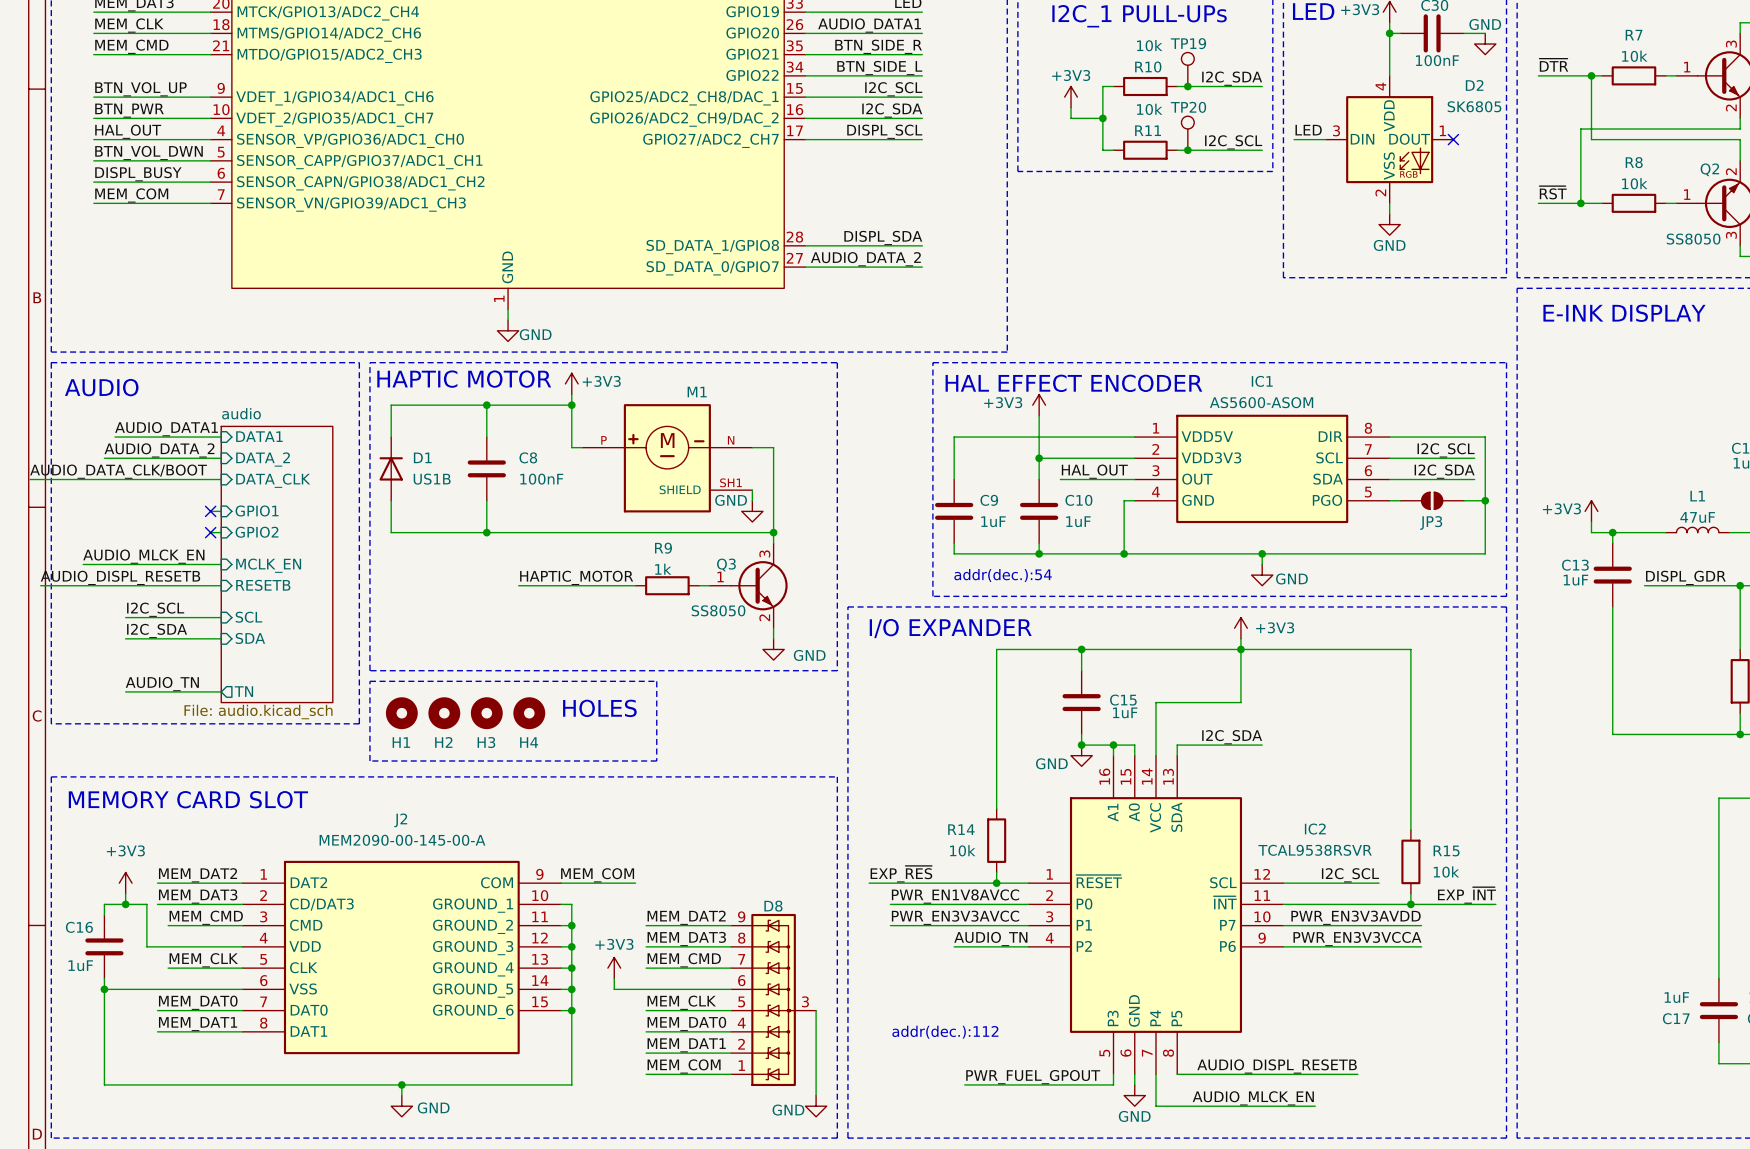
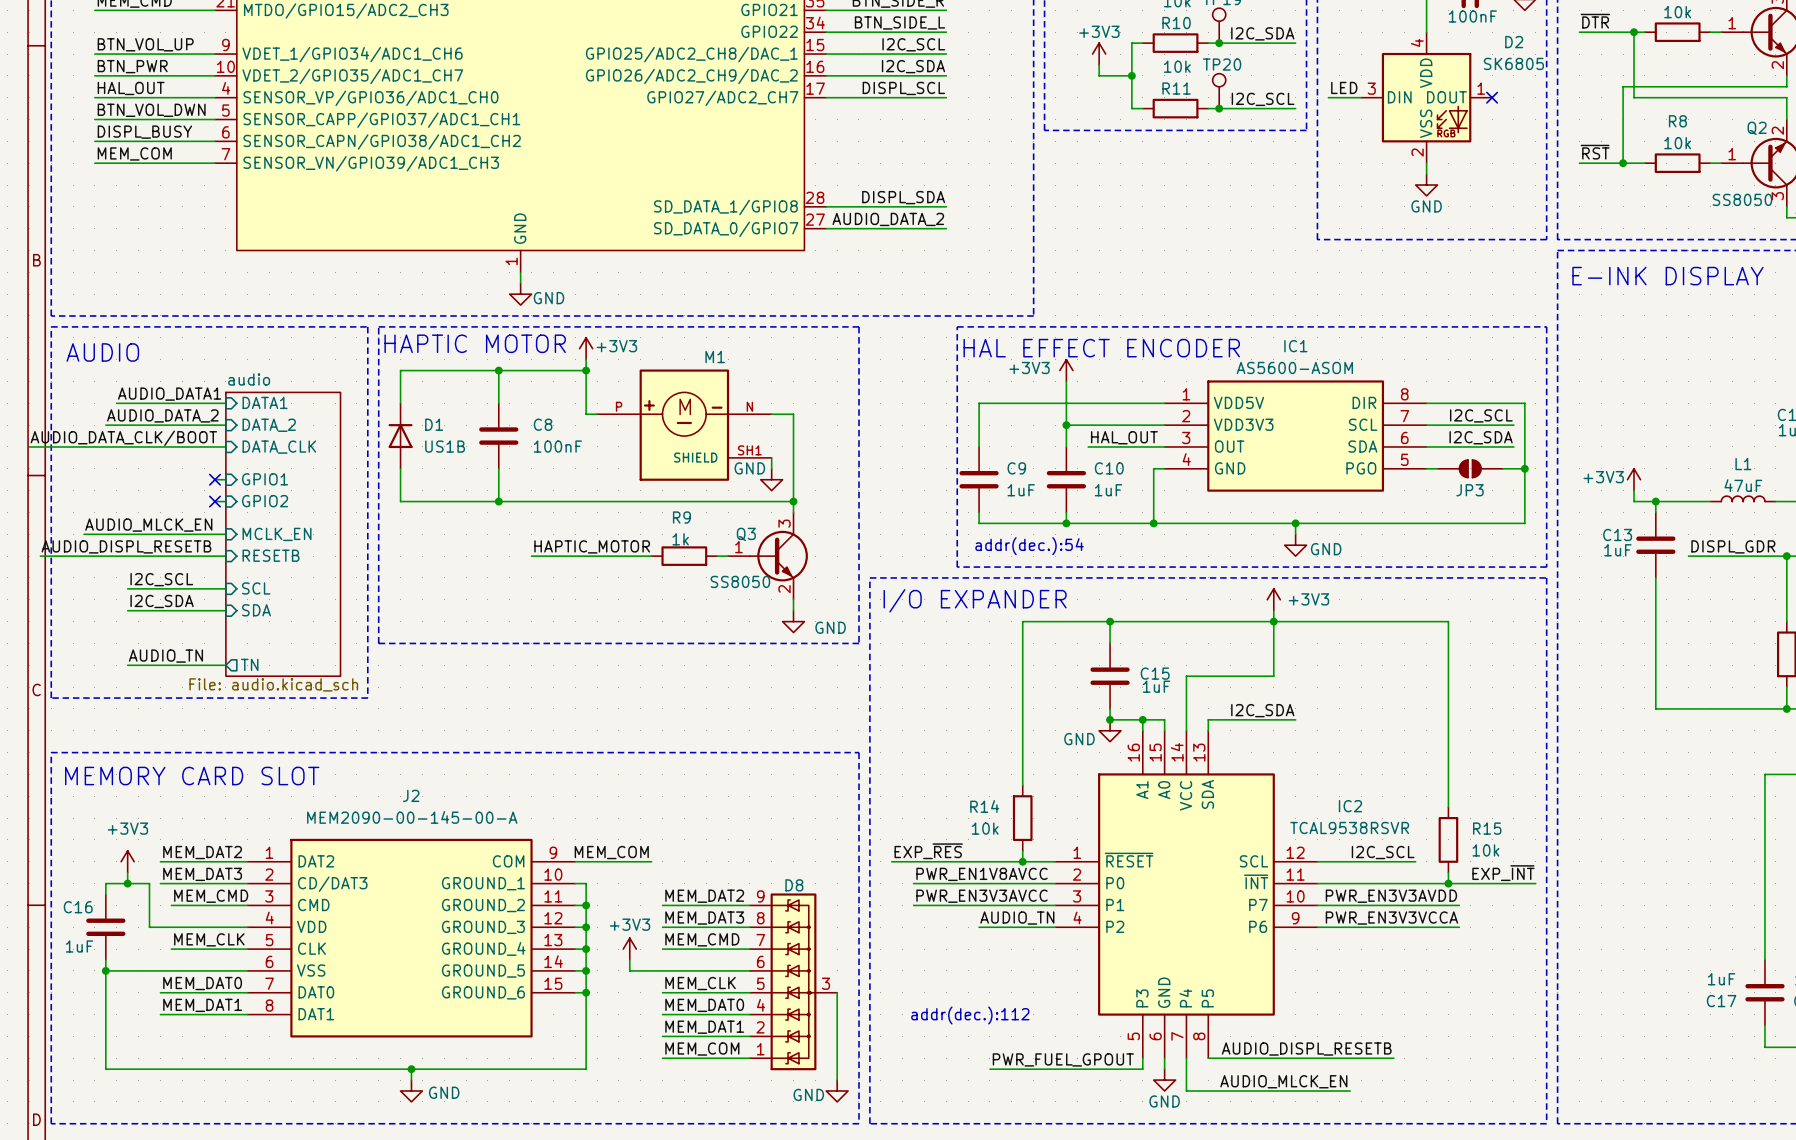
line: (369, 681) (656, 681) (656, 761) (369, 761) (369, 681) -> none
text: HOLES (599, 708) -> none
H1: (401, 713) -> none
H2: (444, 713) -> none
H3: (486, 713) -> none
H4: (529, 713) -> none

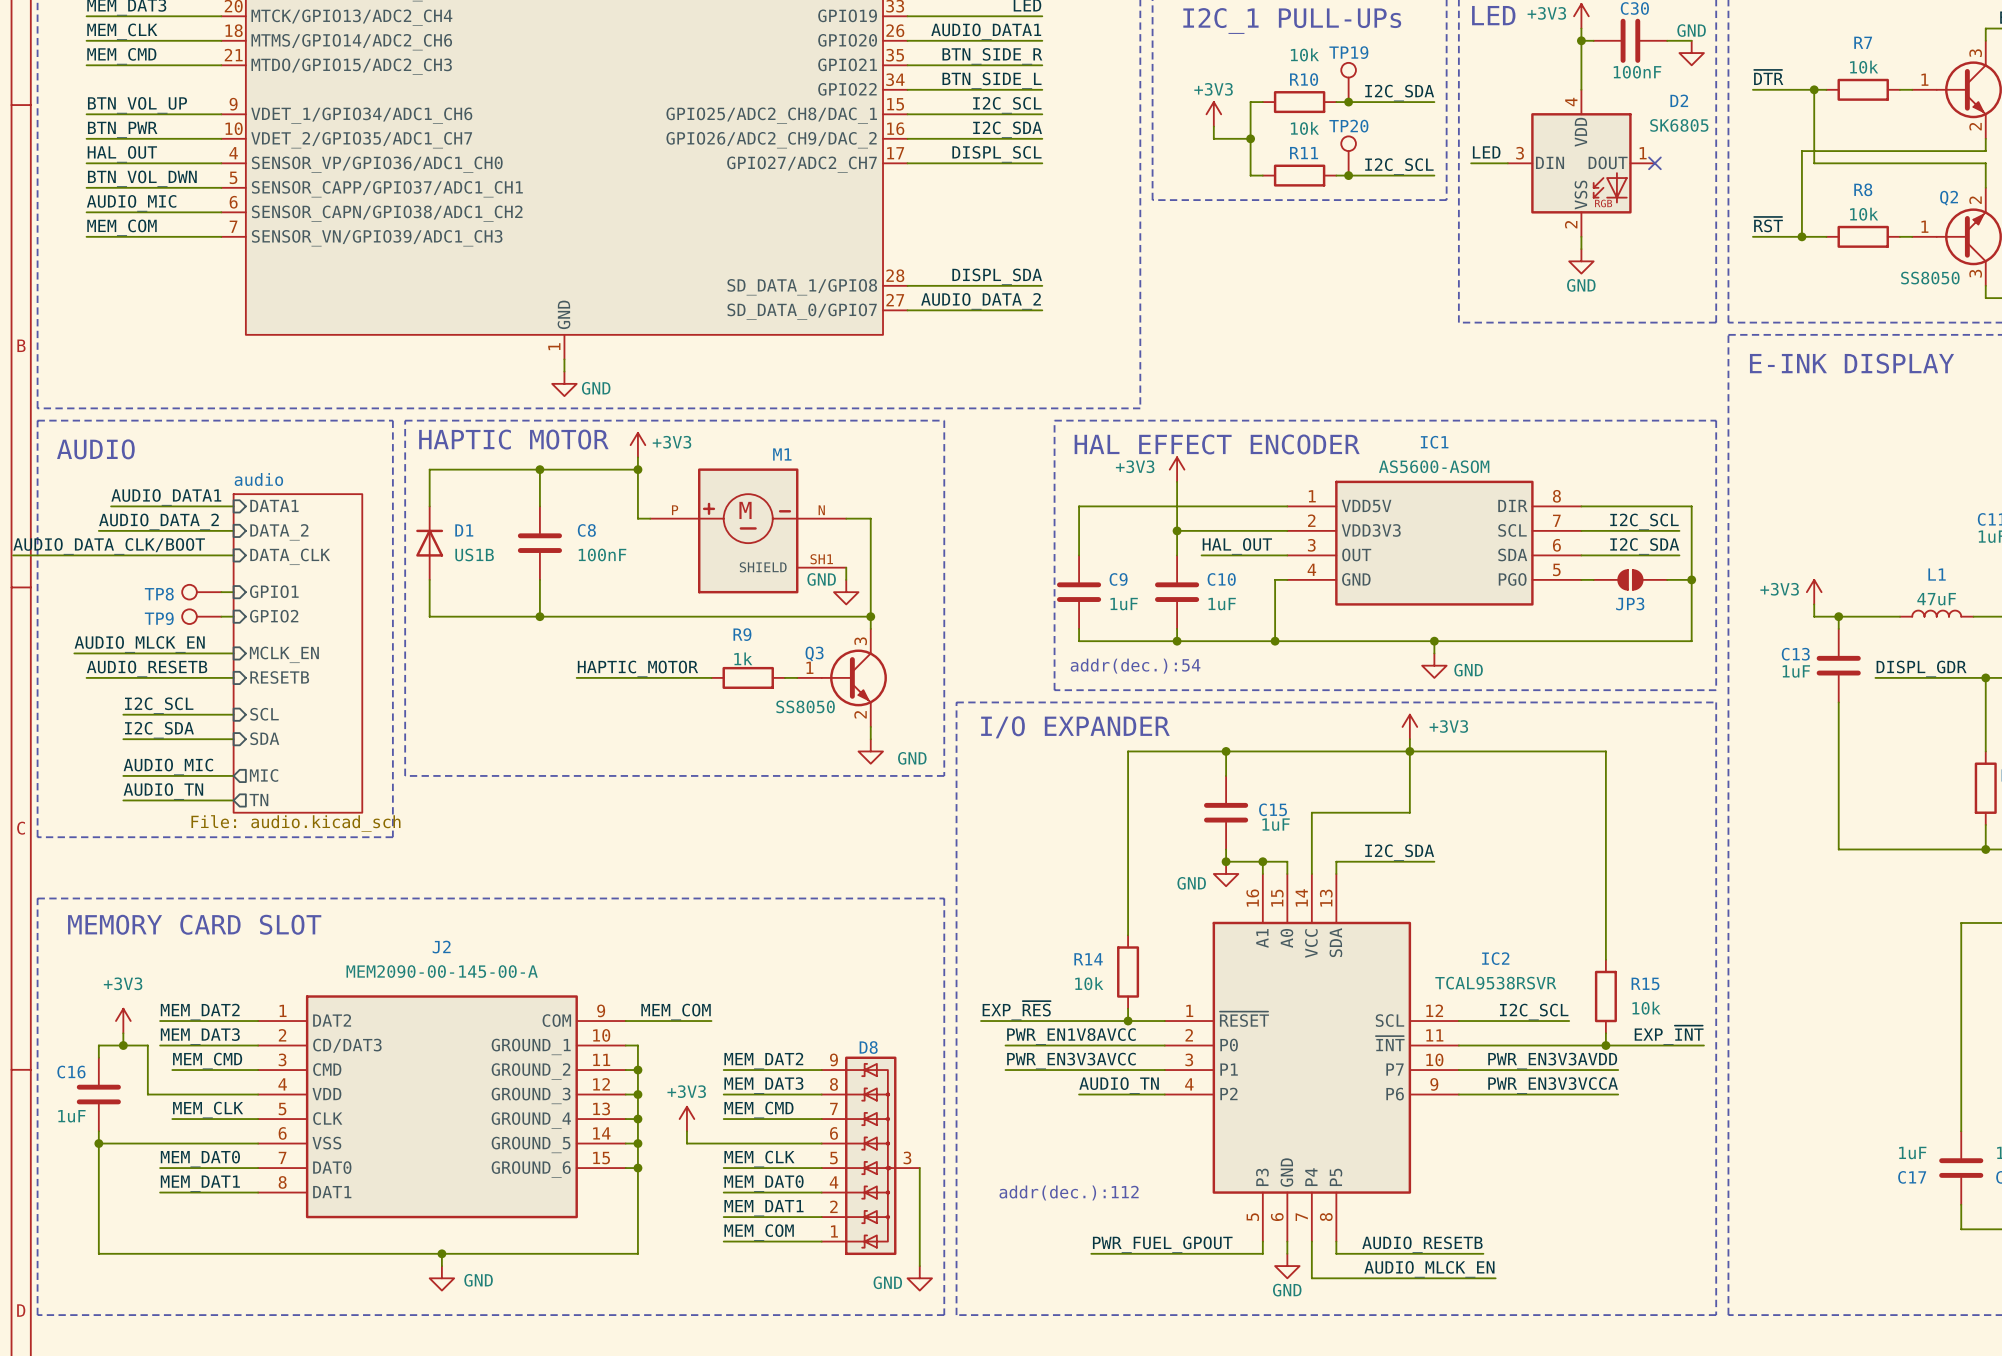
label: DISPL_BUSY (144, 132) -> AUDIO_MIC (131, 203)
TP8: none -> (201, 592)
no-connect mark: (214, 479) -> none
TP9: none -> (201, 616)
no-connect mark: (214, 501) -> none
label: AUDIO_DISPL_RESETB (126, 546) -> AUDIO_RESETB (147, 668)
wire: (40, 556) (94, 556) -> none
label: none -> AUDIO_MIC (168, 766)
wire: none -> (123, 775) (233, 775)
sheet pin: none -> MIC (264, 775)
label: AUDIO_DISPL_RESETB (1306, 1049) -> AUDIO_RESETB (1422, 1244)
wire: (1208, 1058) (1393, 1058) -> (1336, 1241) (1336, 1253) (1483, 1253)

